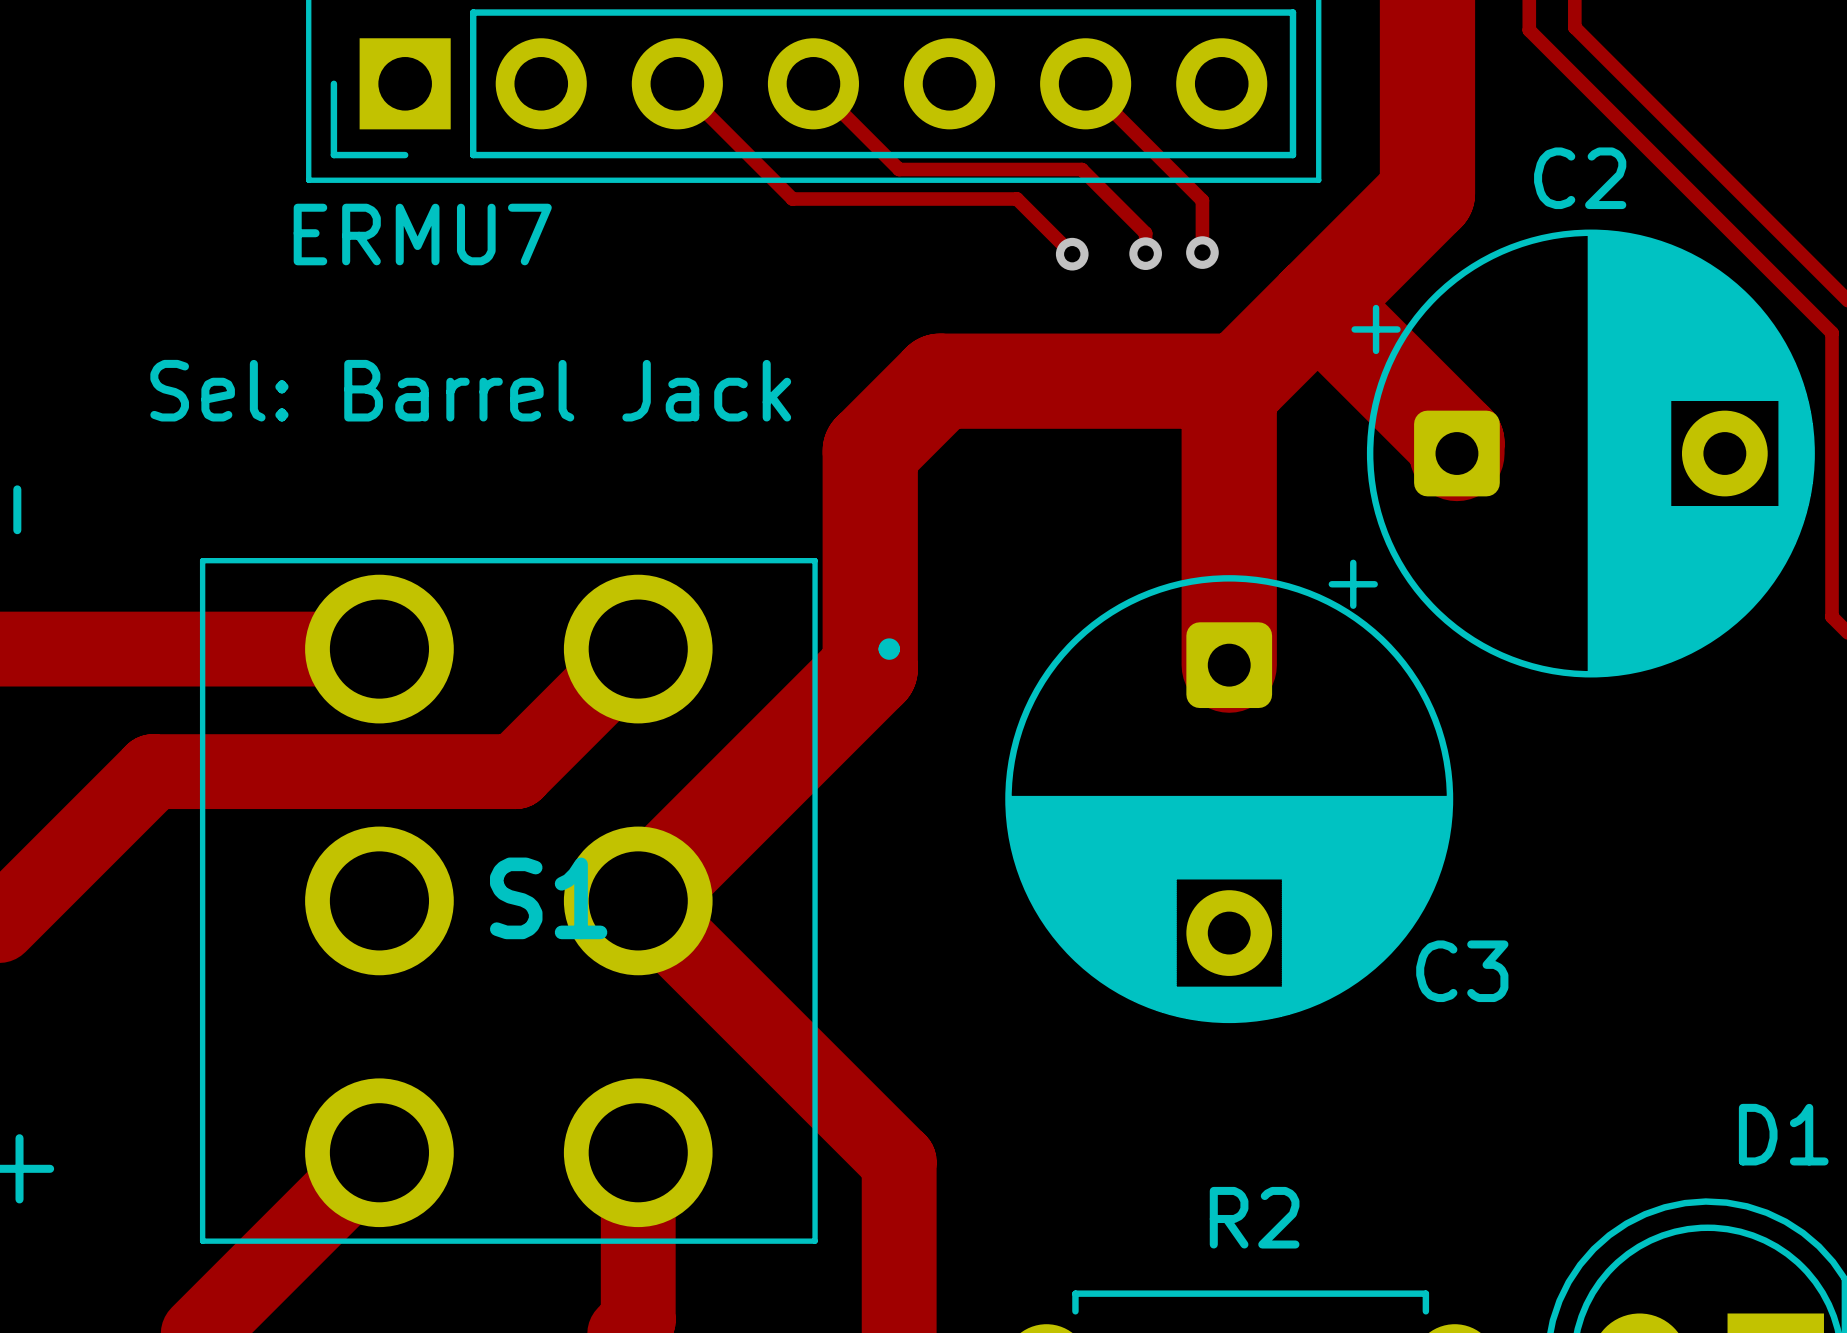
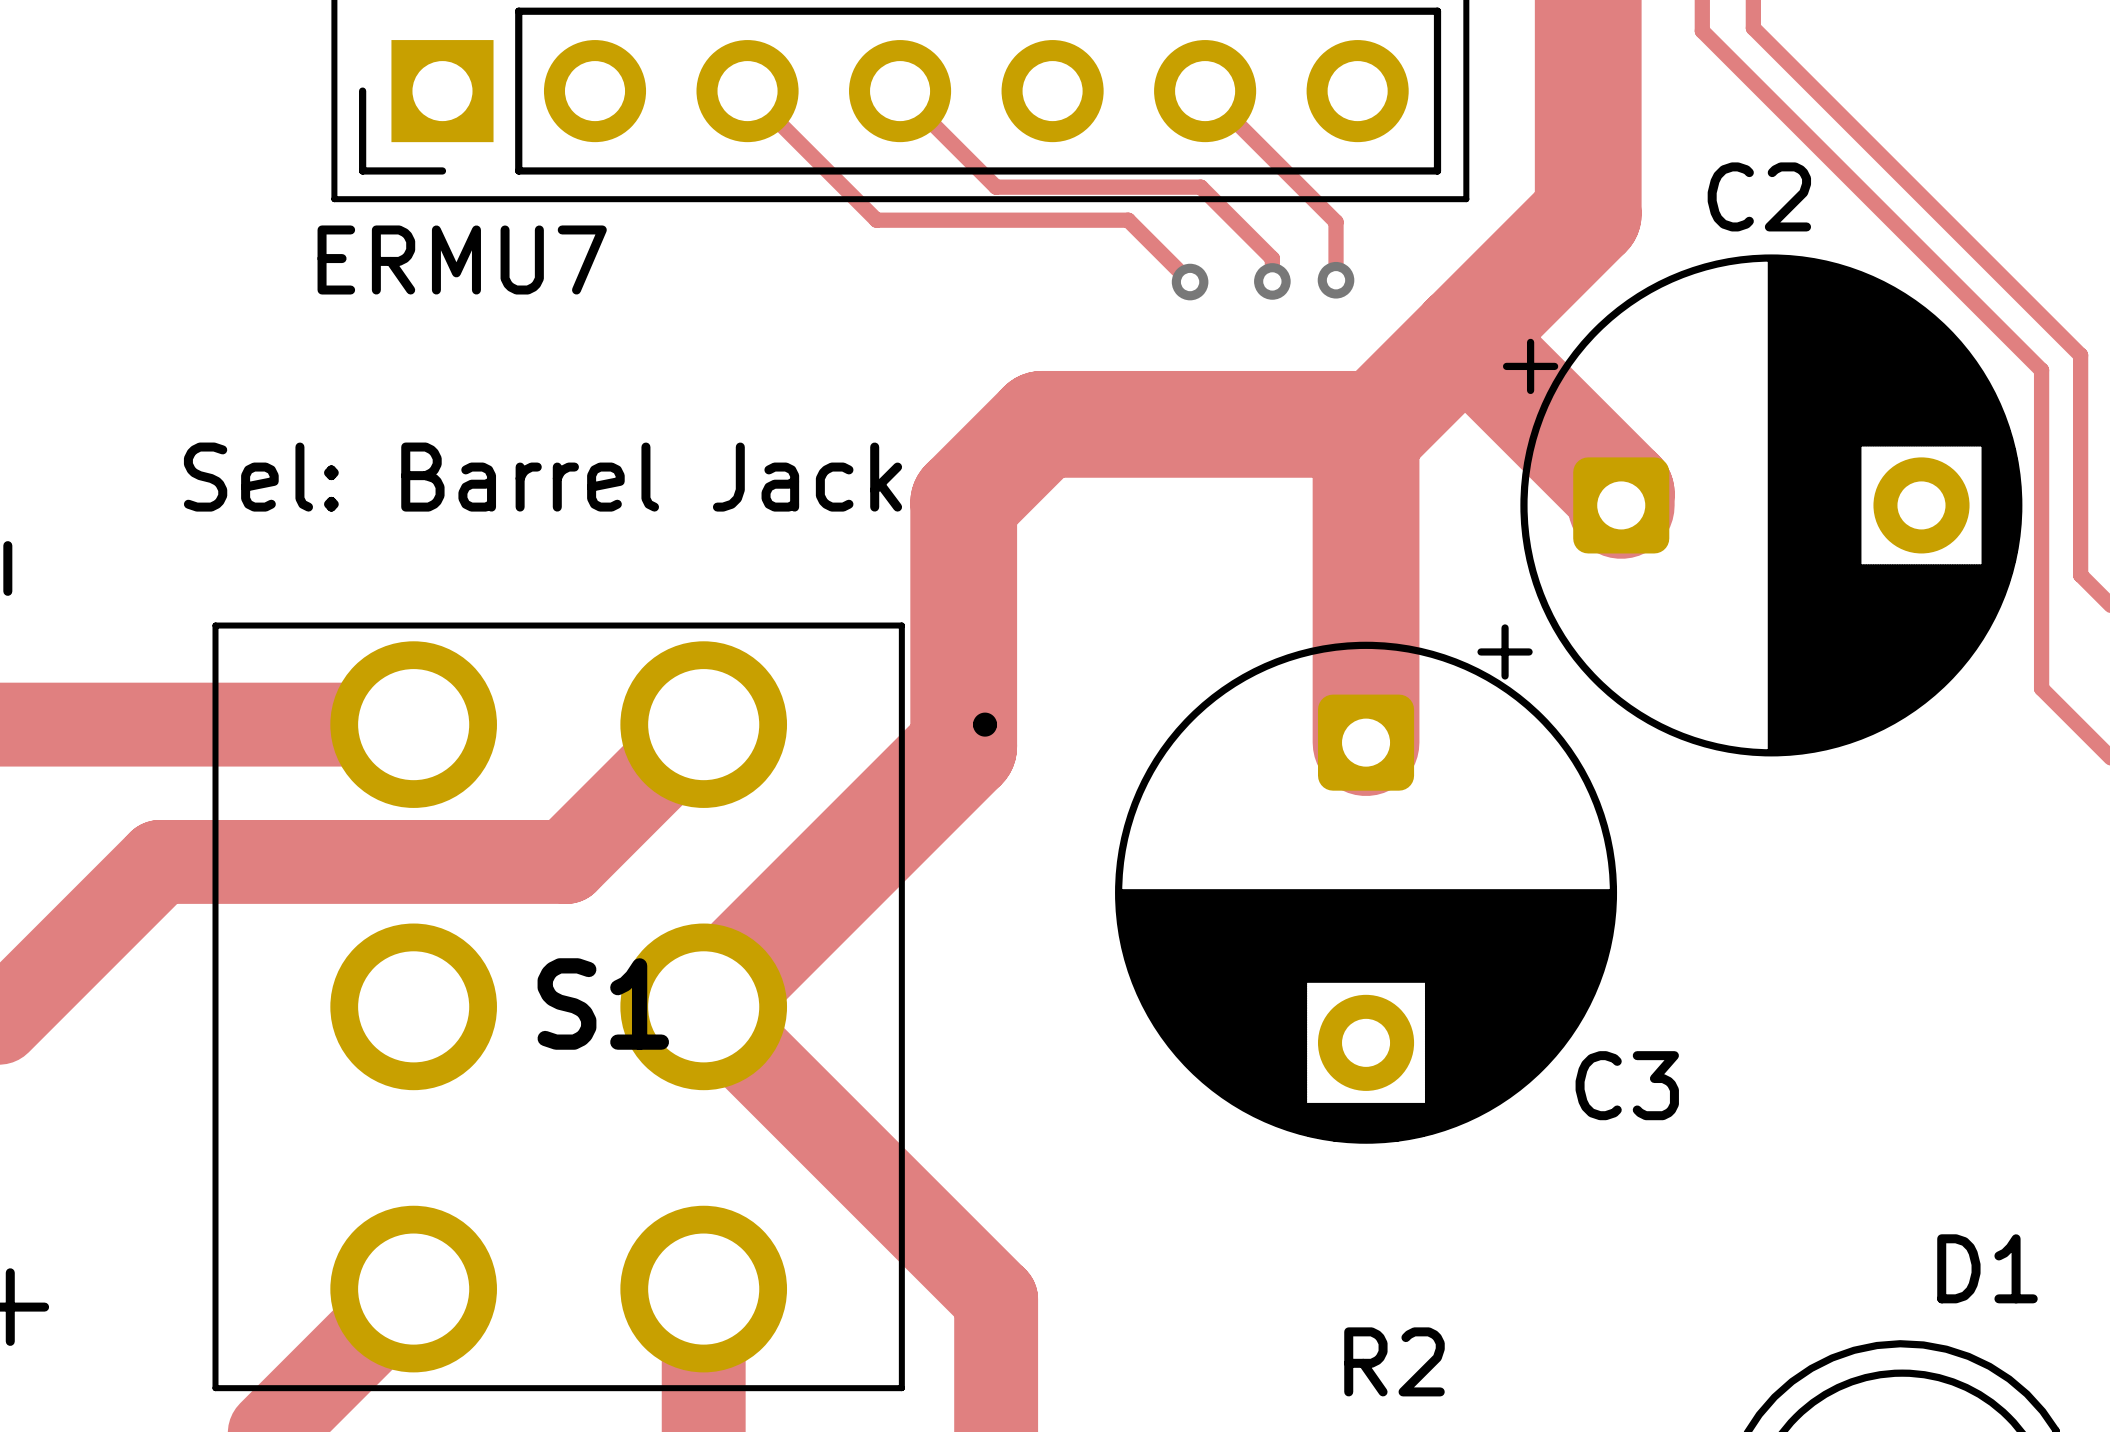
text position: Sel: Barrel Jack (470, 390) -> Sel: Barrel Jack (543, 477)

